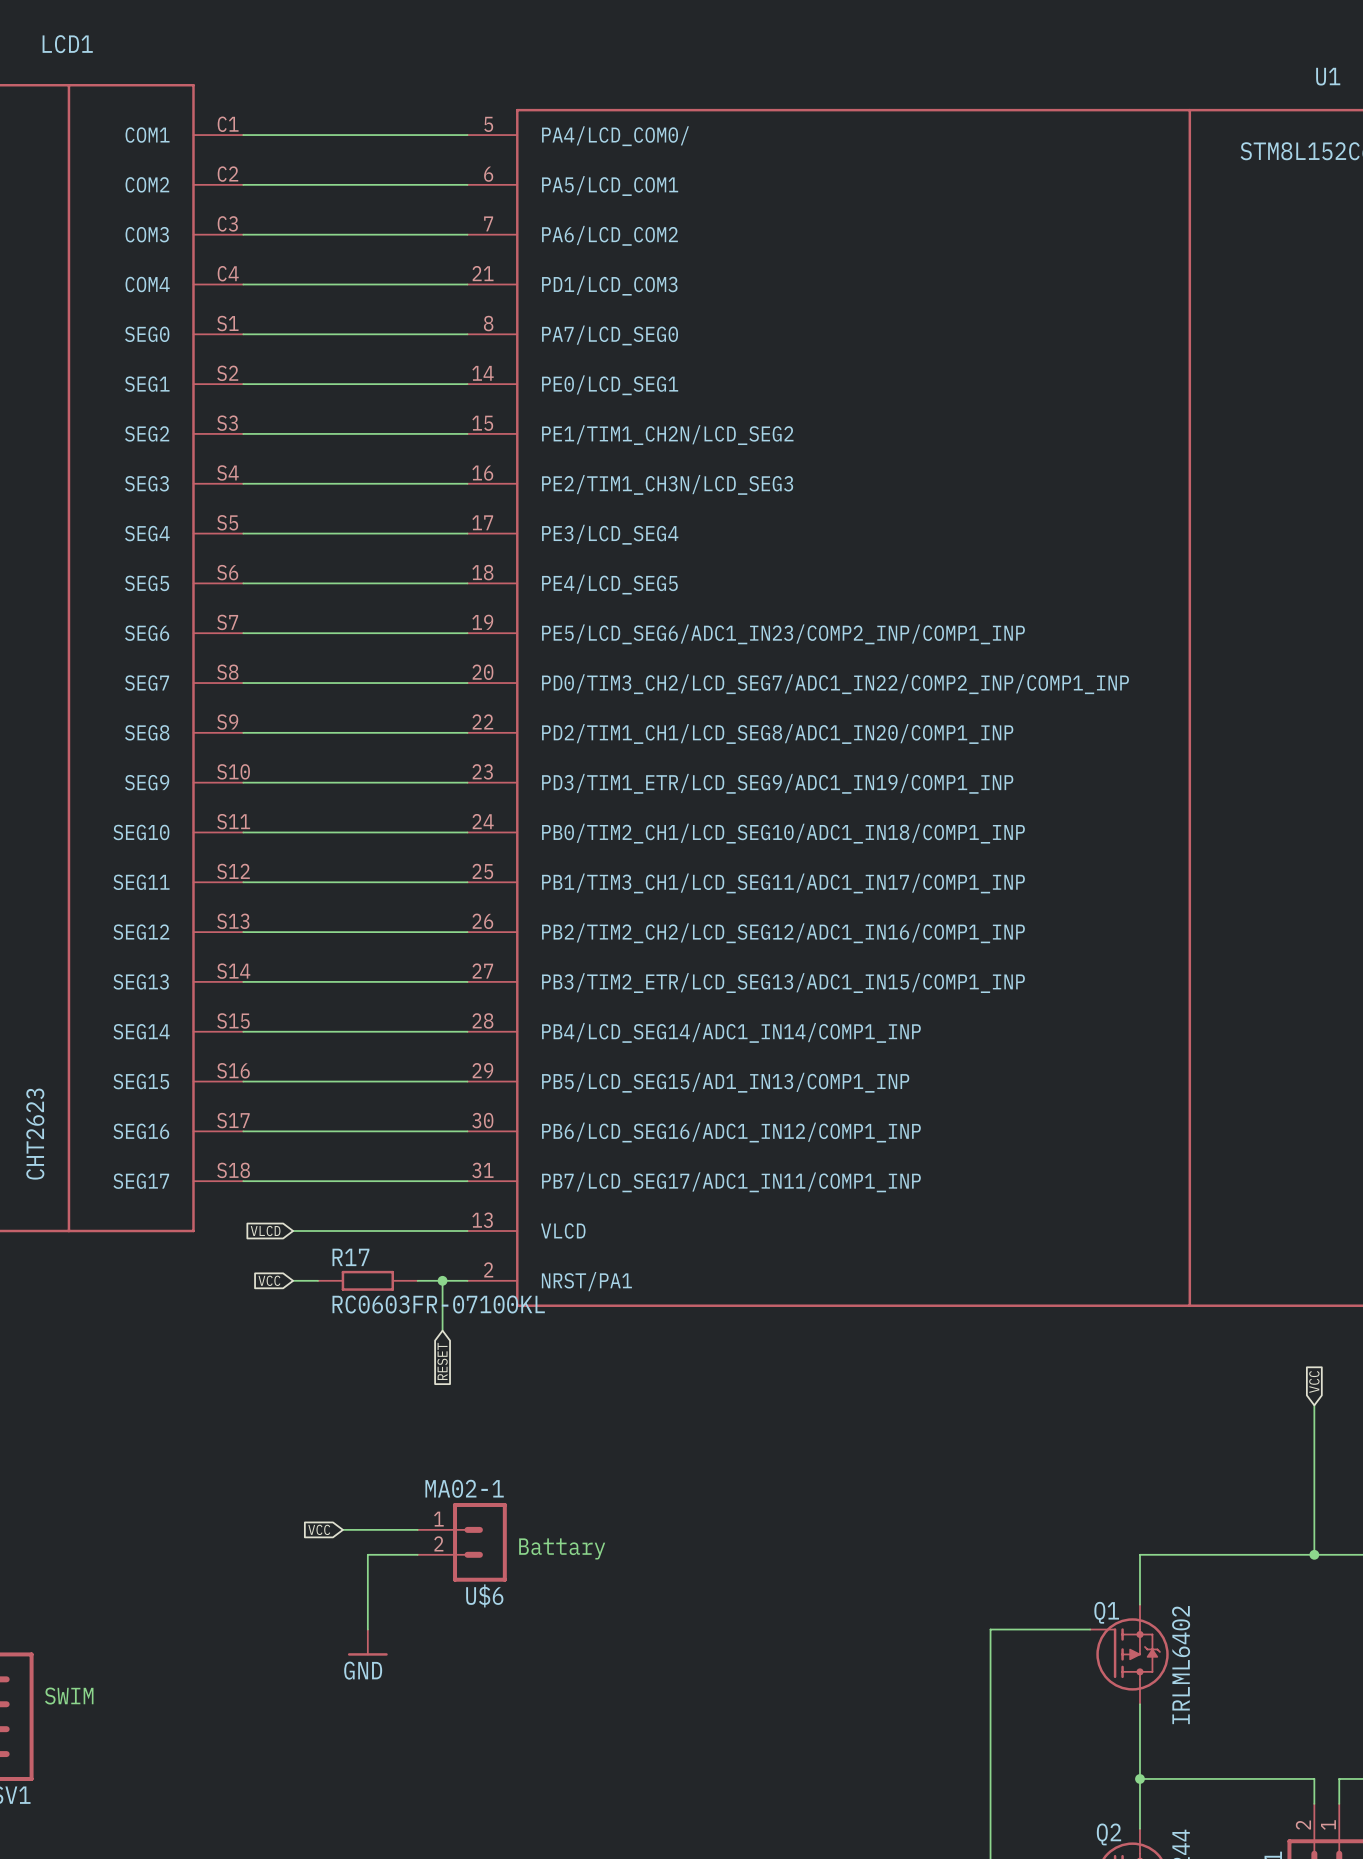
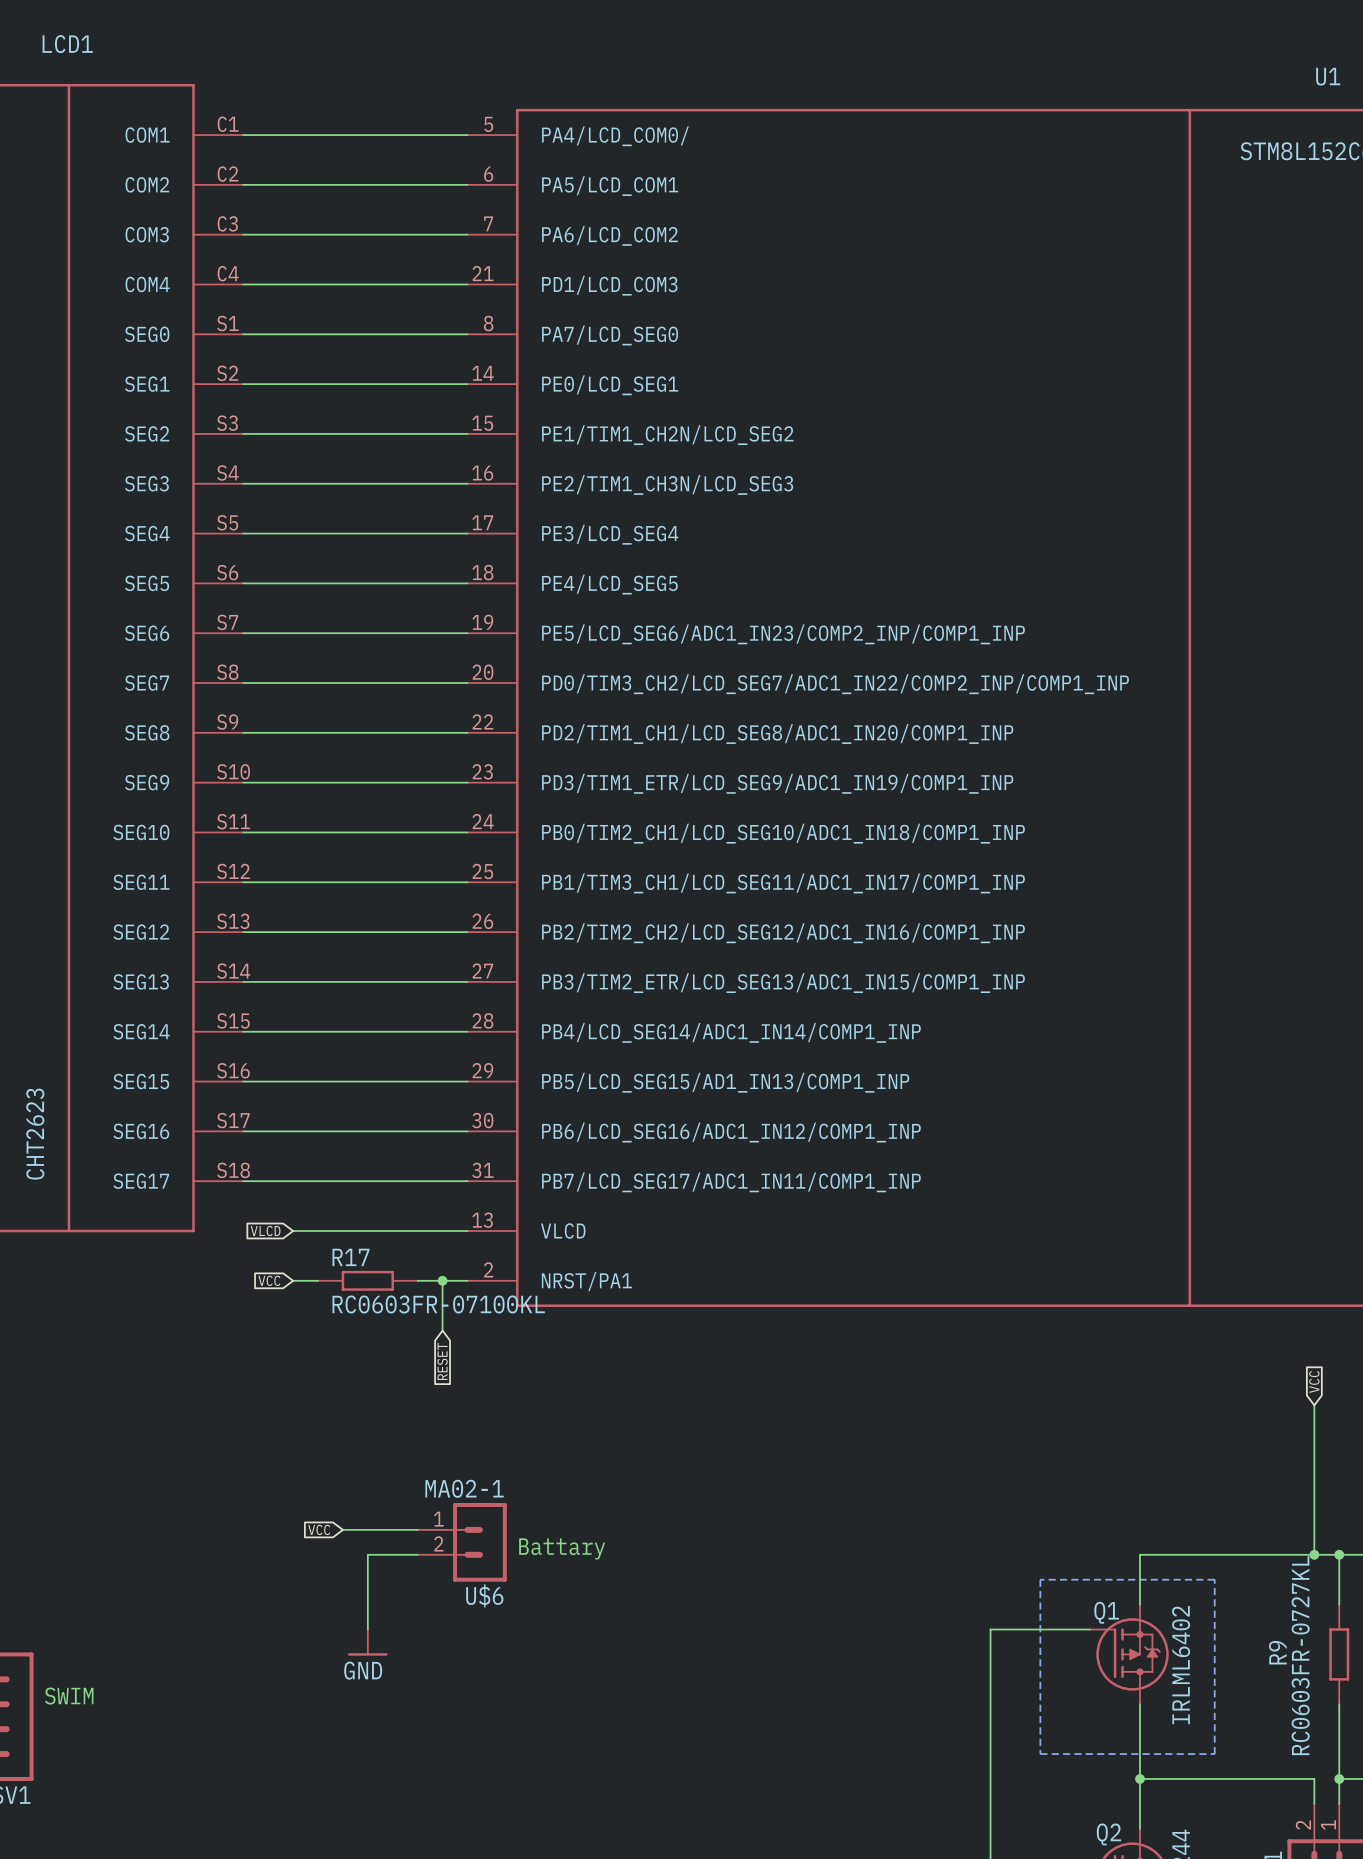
wire: none -> (1339, 1554) (1339, 1604)
junction: none -> (1339, 1554)
line: none -> (1040, 1579) (1214, 1579) (1214, 1754) (1040, 1754) (1040, 1579)
R9: none -> RC0603FR-0727KL (1339, 1654)
wire: none -> (1339, 1704) (1339, 1778)
junction: none -> (1339, 1778)

